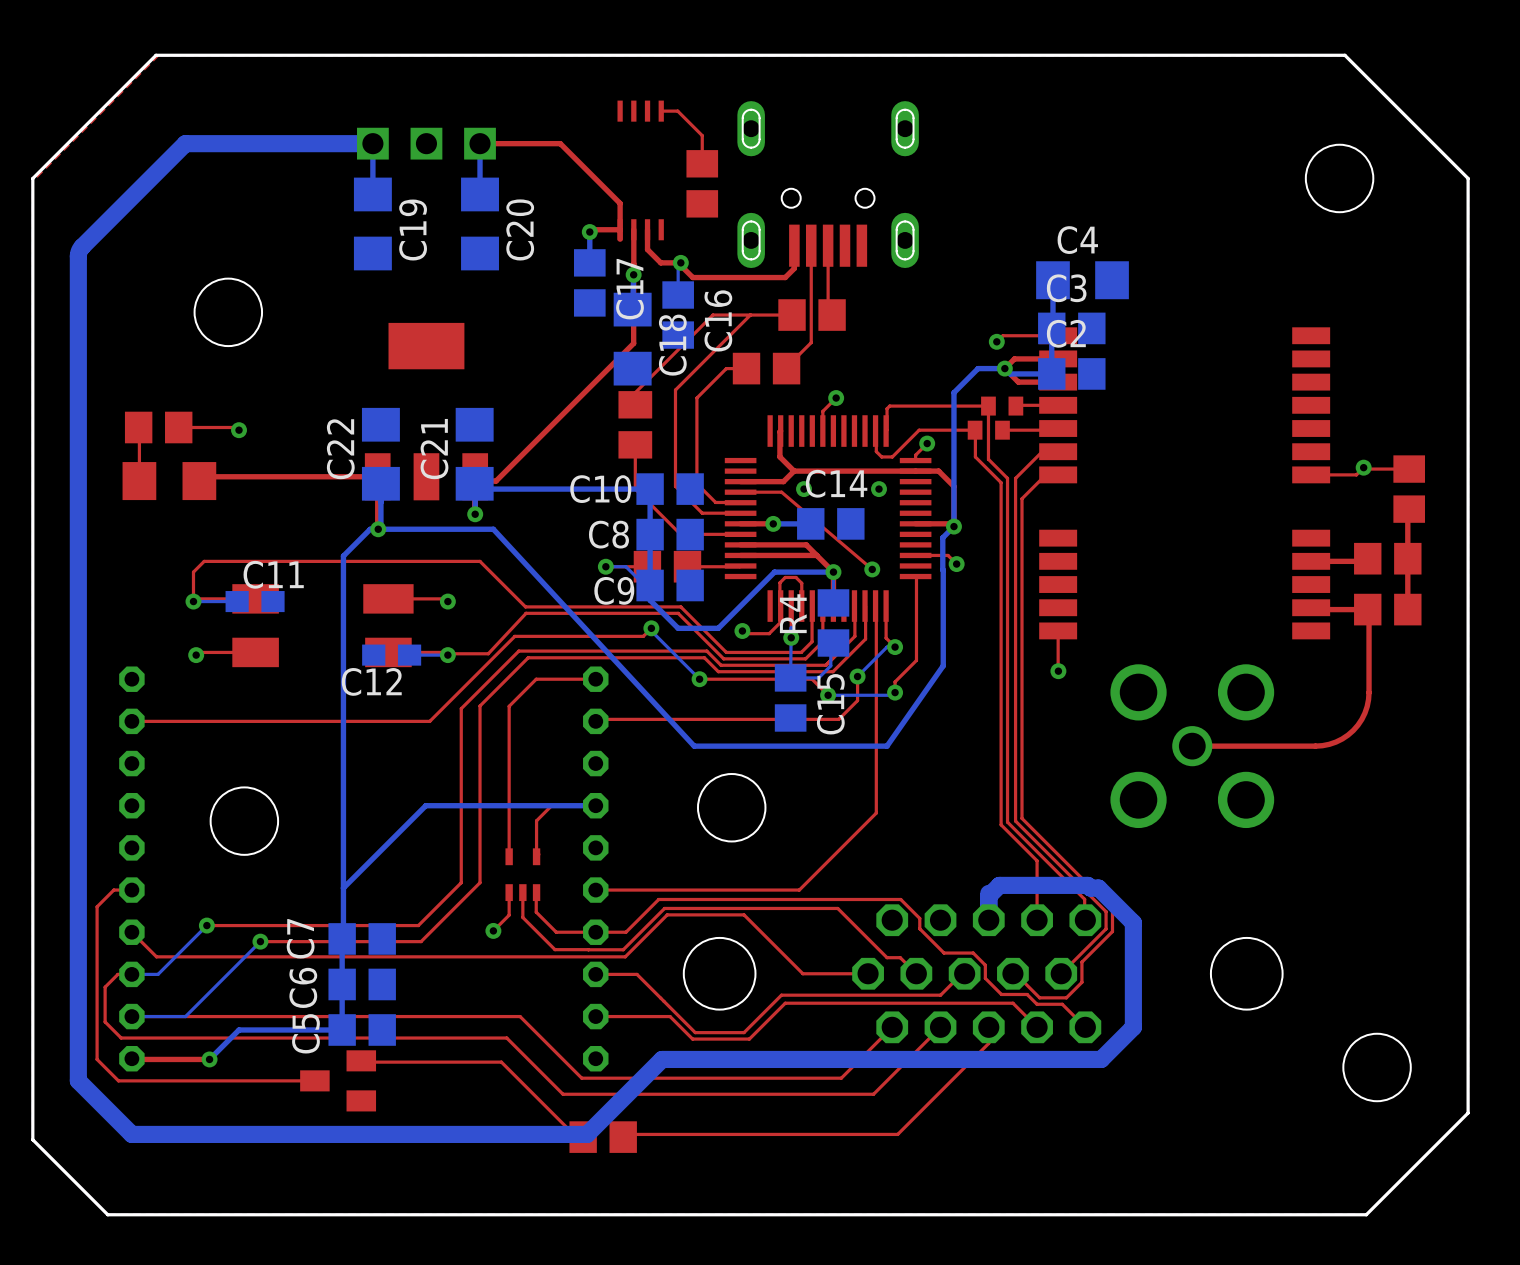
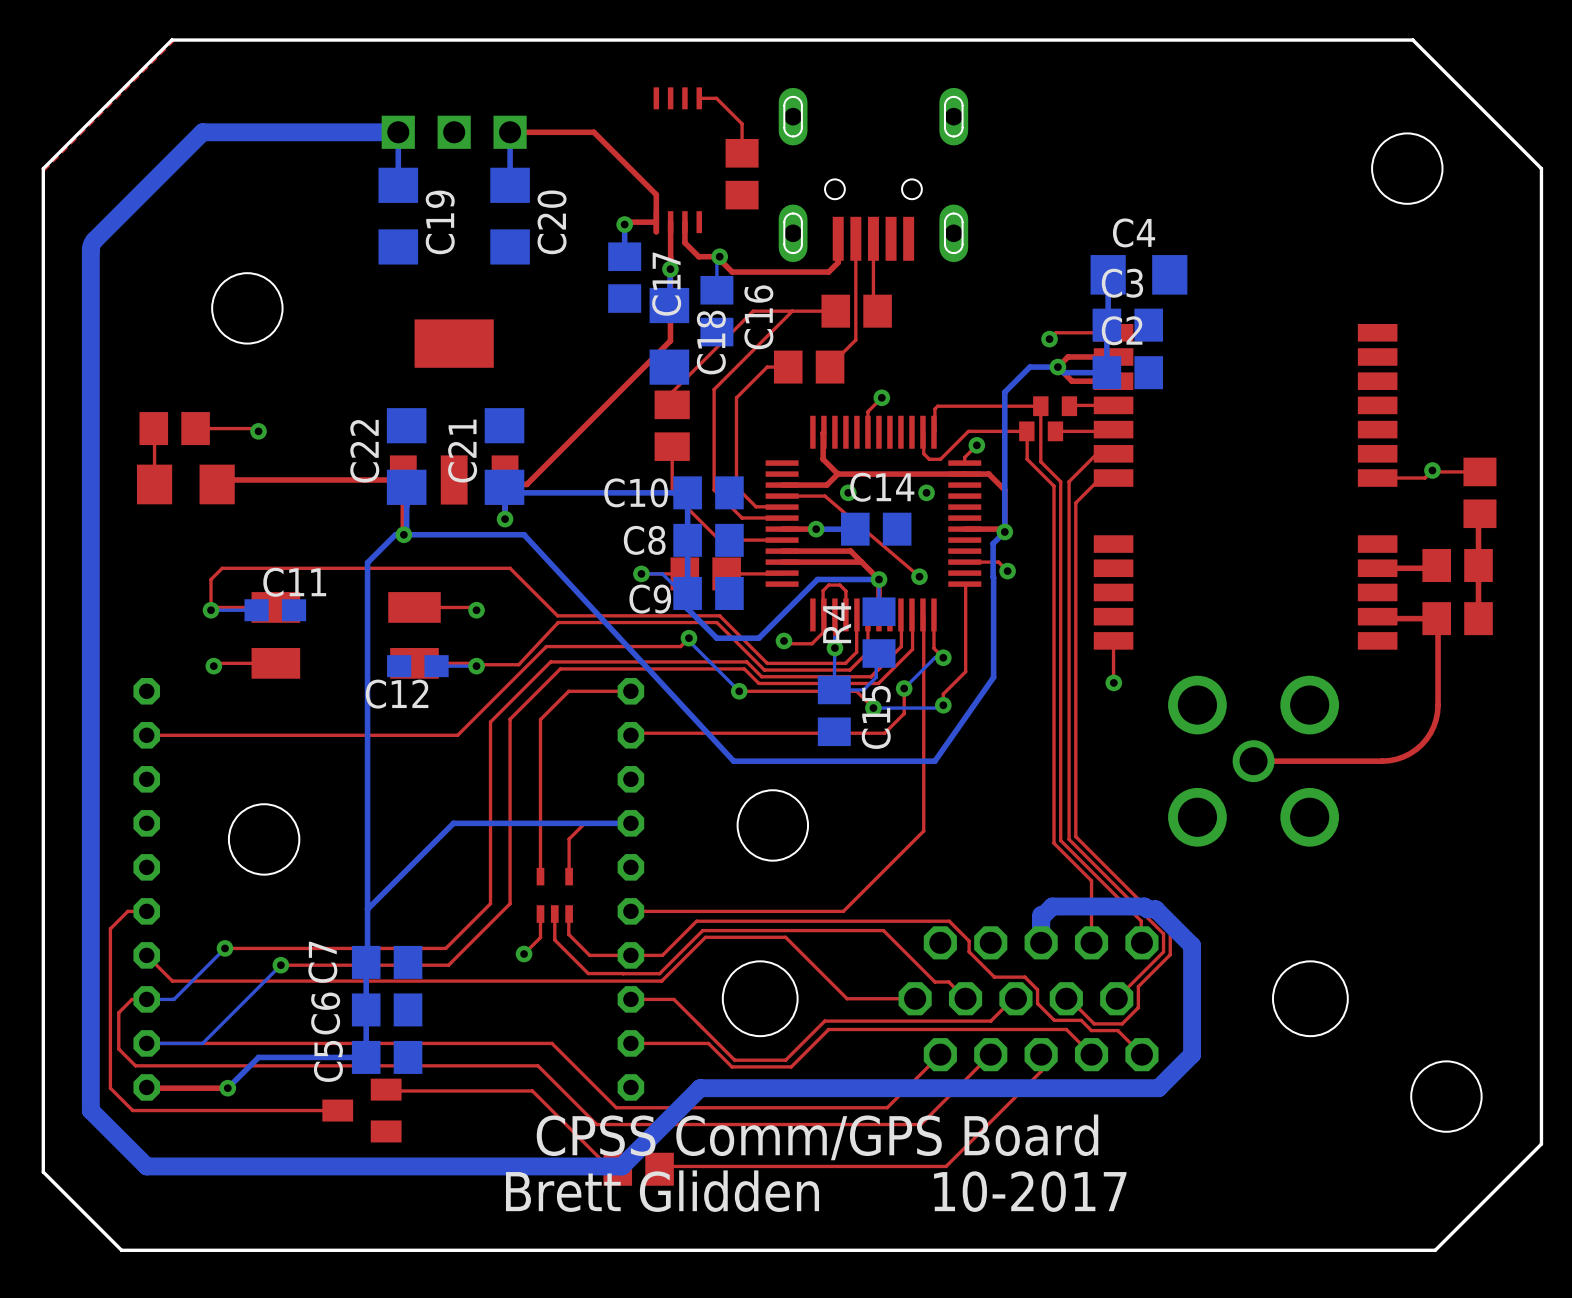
text: none -> CPSS Comm/GPS Board (817, 1137)
text: none -> Brett Glidden (662, 1191)
text: none -> 10-2017 (1030, 1191)

